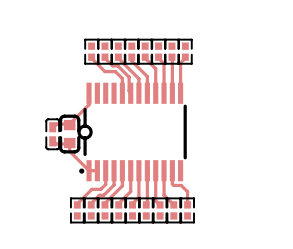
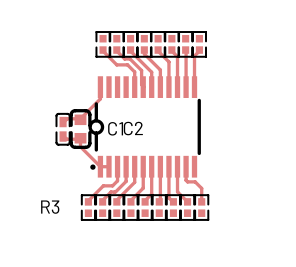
C1 name: none -> C1 (115, 128)
C2 name: none -> C2 (133, 128)
R3 name: none -> R3 (50, 207)

